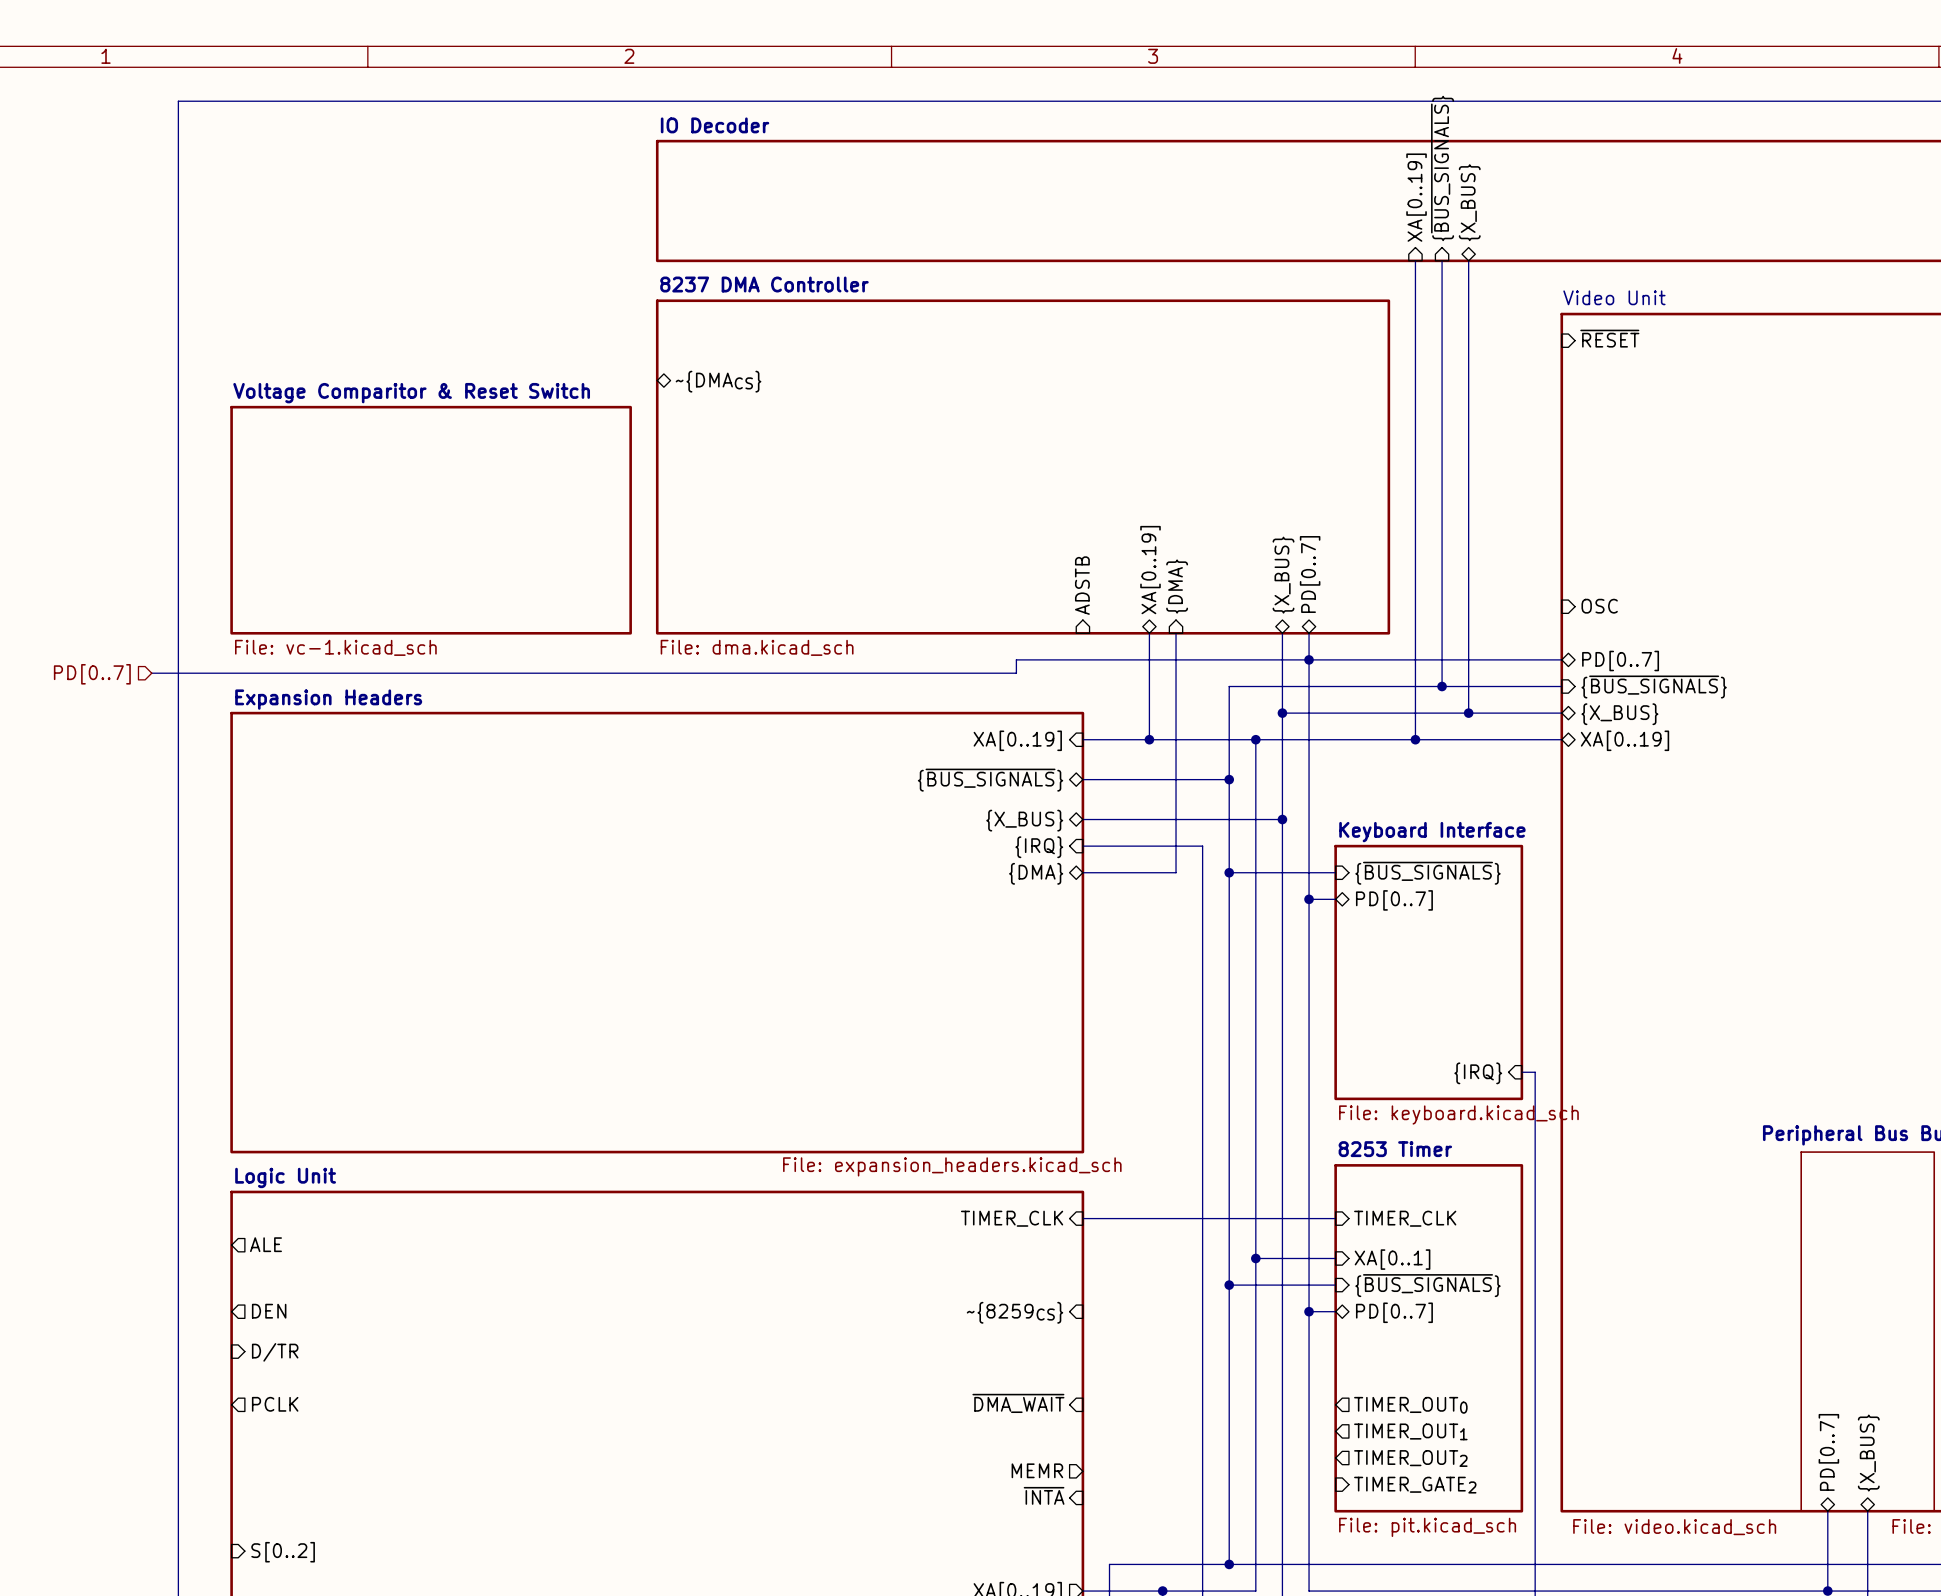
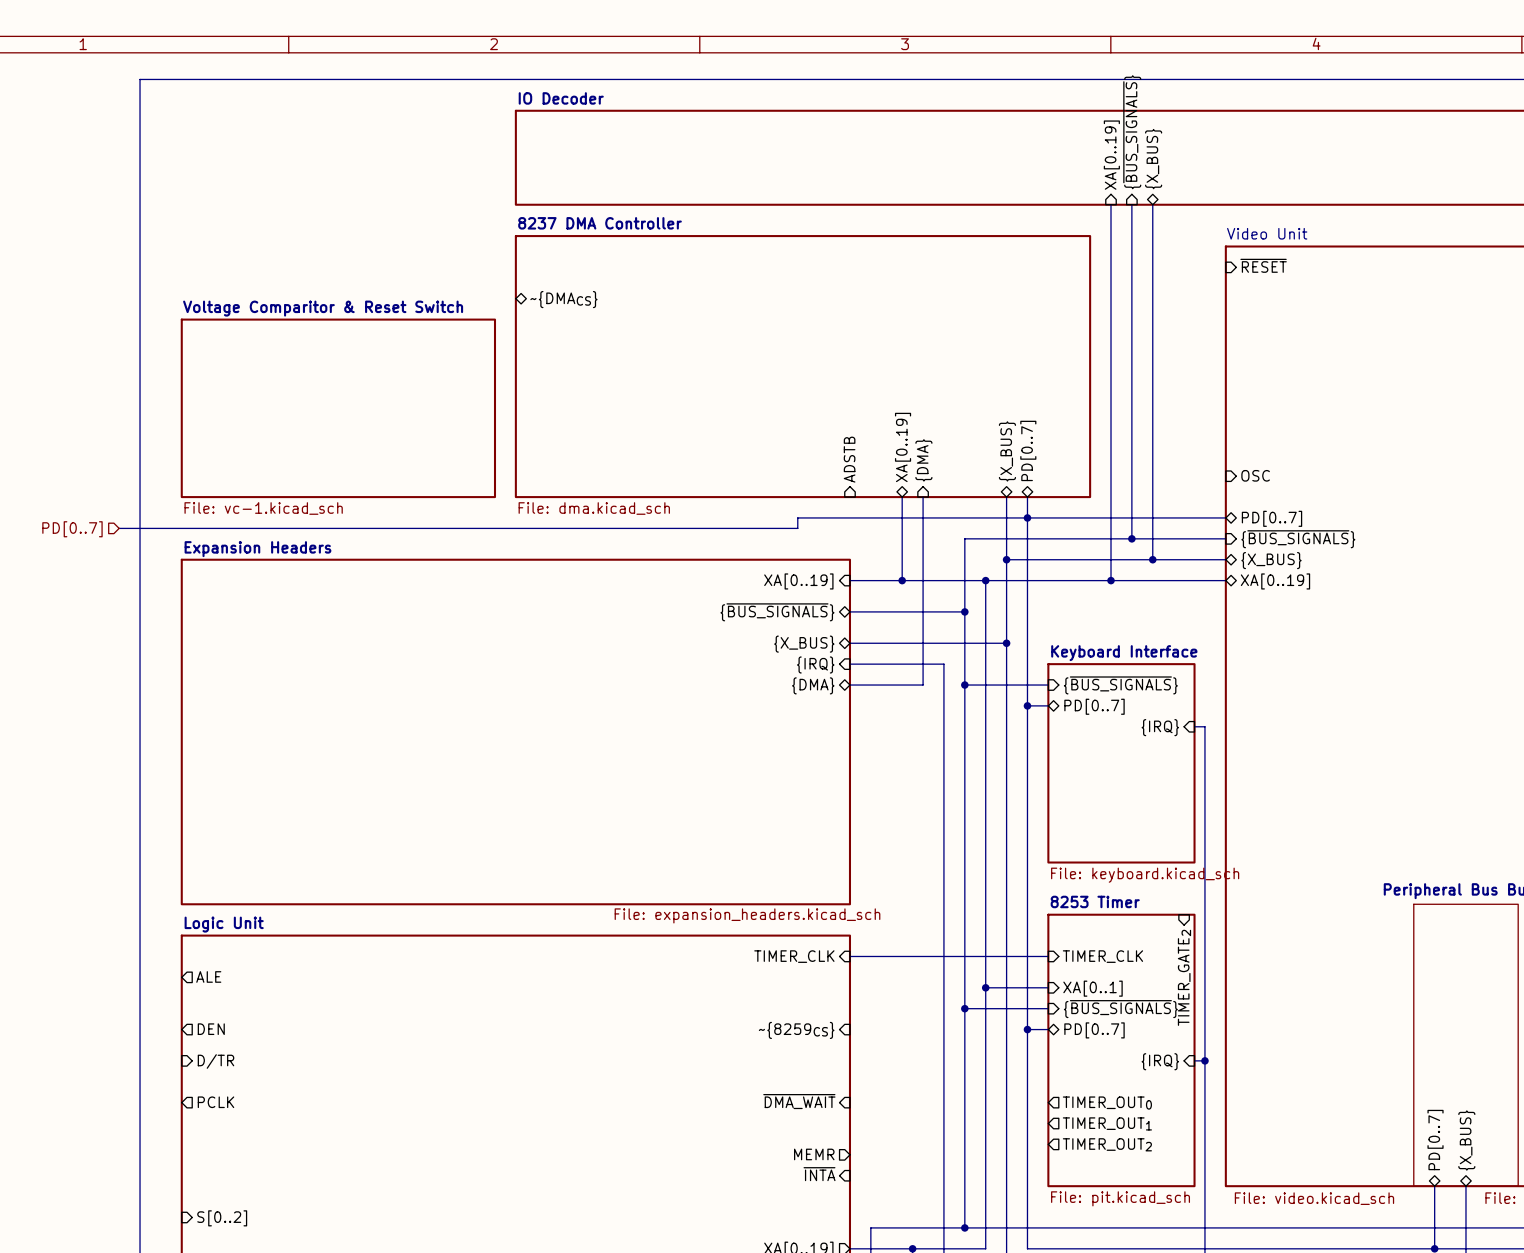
sheet pin: none -> {IRQ} (1160, 727)
bus: (1521, 1072) (1535, 1072) -> (1194, 726) (1204, 726) (1204, 841)
sheet pin: {IRQ} (1478, 1073) -> none
sheet pin: none -> TIMER_GATE2 (1184, 977)
bus: none -> (1194, 1060) (1204, 1060)
junction: none -> (1204, 1060)
sheet pin: none -> {IRQ} (1160, 1061)
sheet pin: TIMER_GATE2 (1415, 1485) -> none

